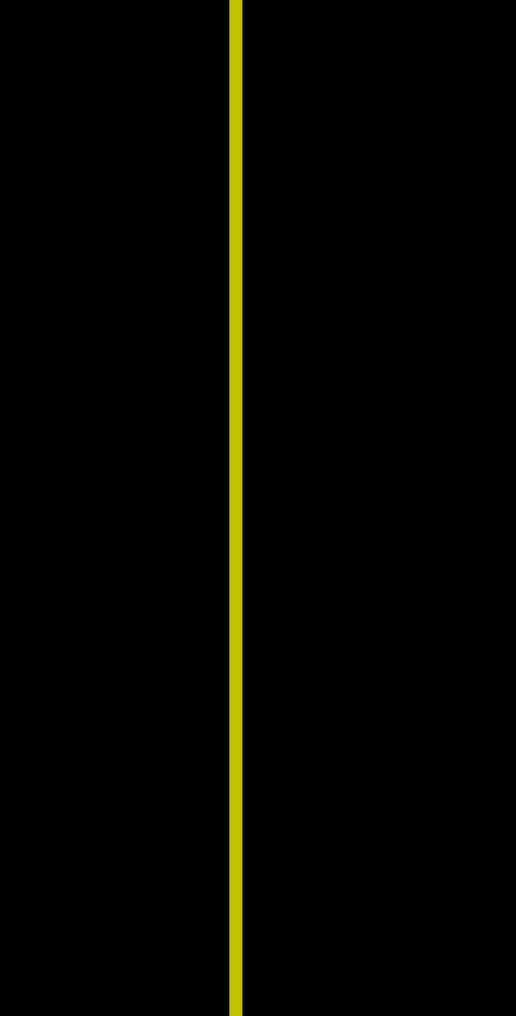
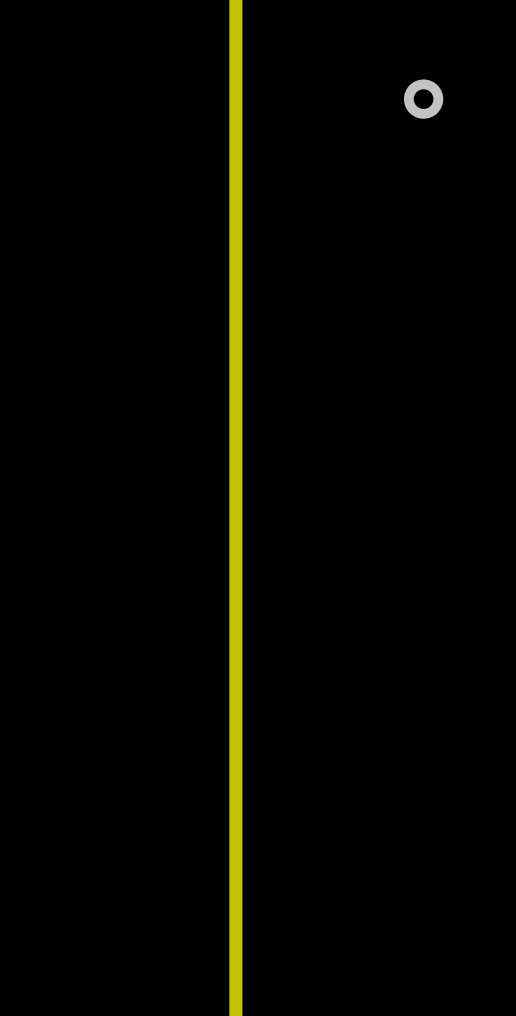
via: none -> (423, 99)

